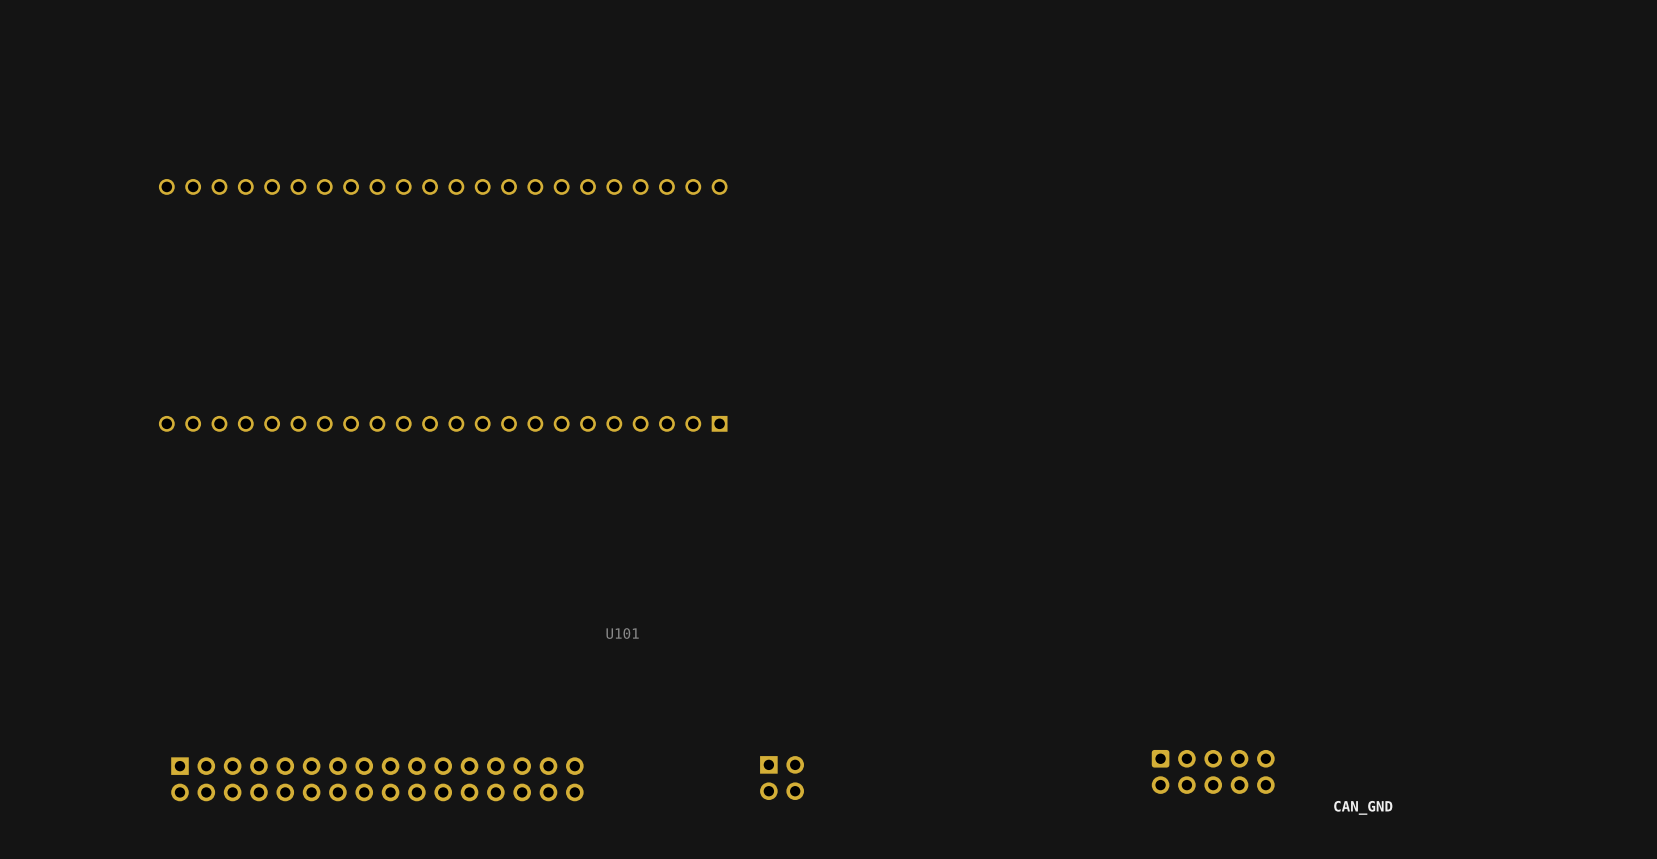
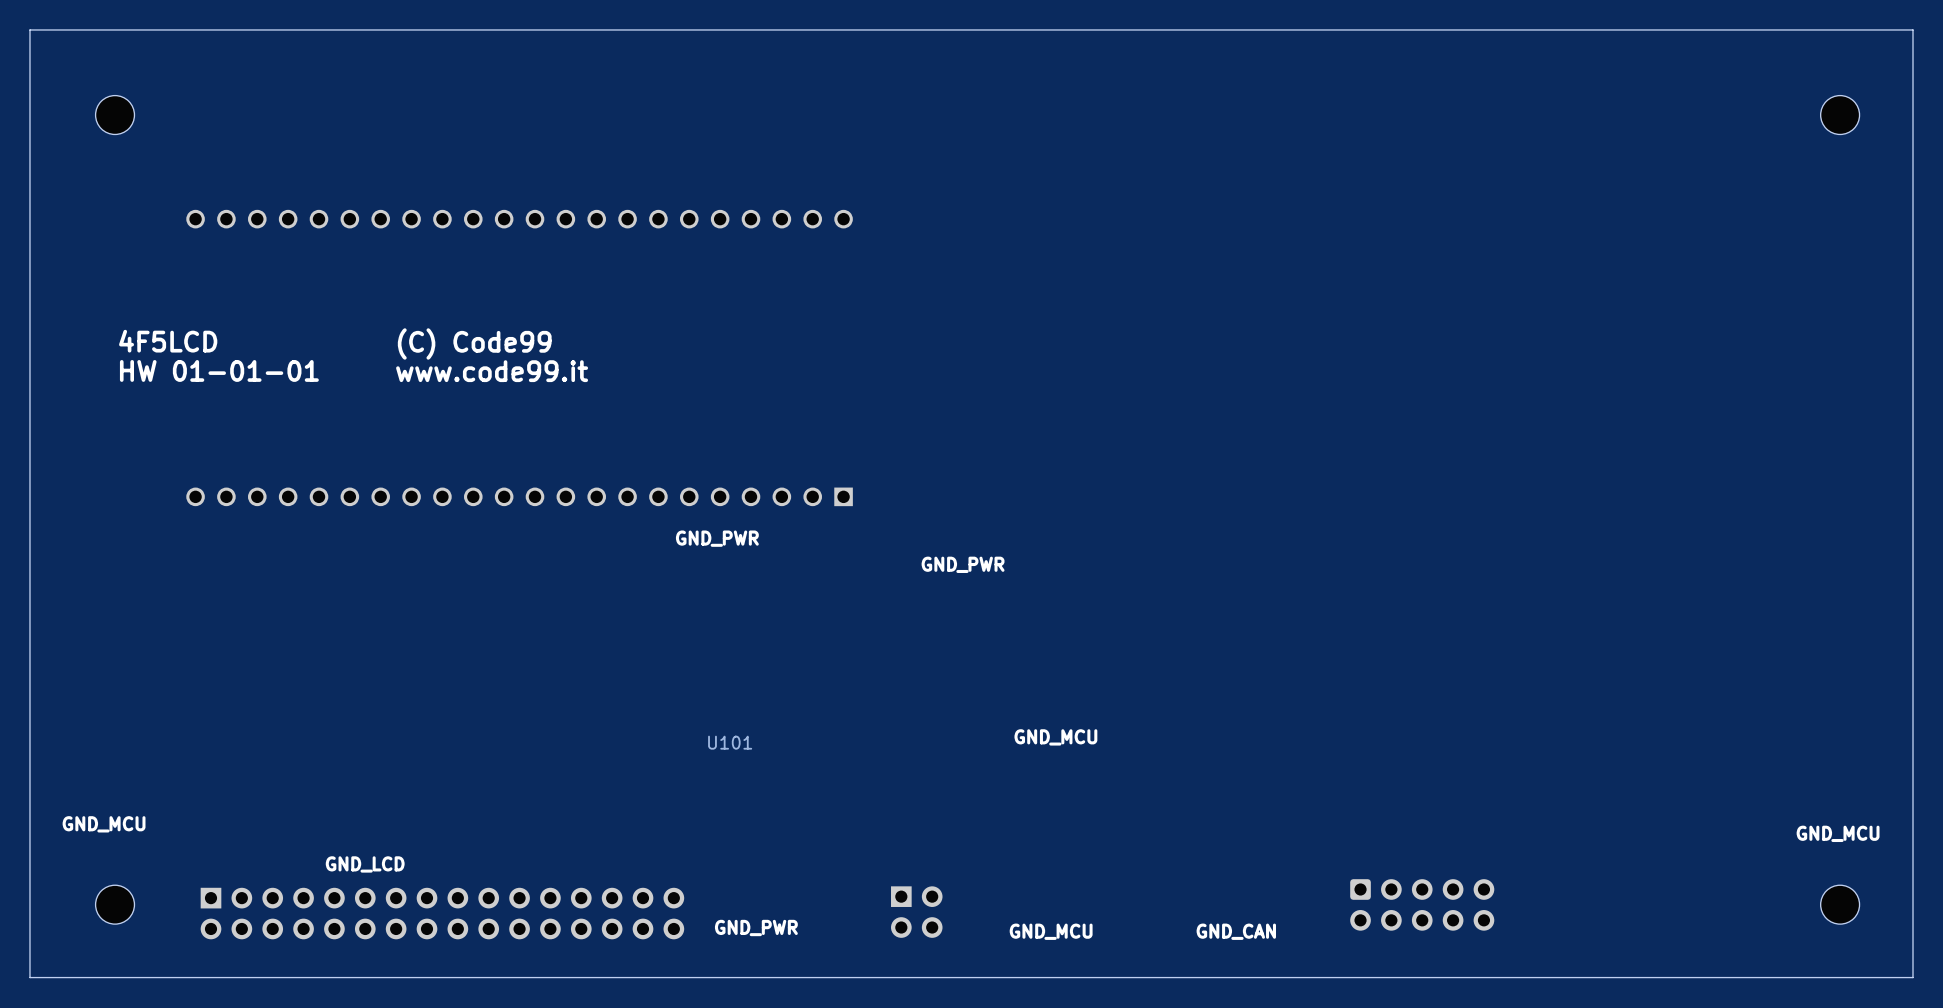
board edge: none -> (1913, 29) (29, 29) (29, 977) (1913, 977) (1913, 29)
part: none -> (115, 115)
part: none -> (1840, 115)
text: none -> 4F5LCD (168, 341)
text: none -> (C) Code99 (474, 343)
text: none -> www.code99.it (492, 371)
text: none -> HW 01-01-01 (219, 370)
text: none -> GND_PWR (717, 538)
text: none -> GND_PWR (963, 564)
text: none -> GND_MCU (1055, 737)
text: none -> GND_MCU (104, 824)
text: none -> GND_MCU (1838, 833)
text: none -> GND_LCD (365, 864)
part: none -> (115, 904)
part: none -> (1840, 904)
text: none -> GND_PWR (756, 927)
text: none -> GND_MCU (1051, 931)
text: none -> GND_CAN (1236, 931)
text: CAN_GND (1363, 807) -> none

